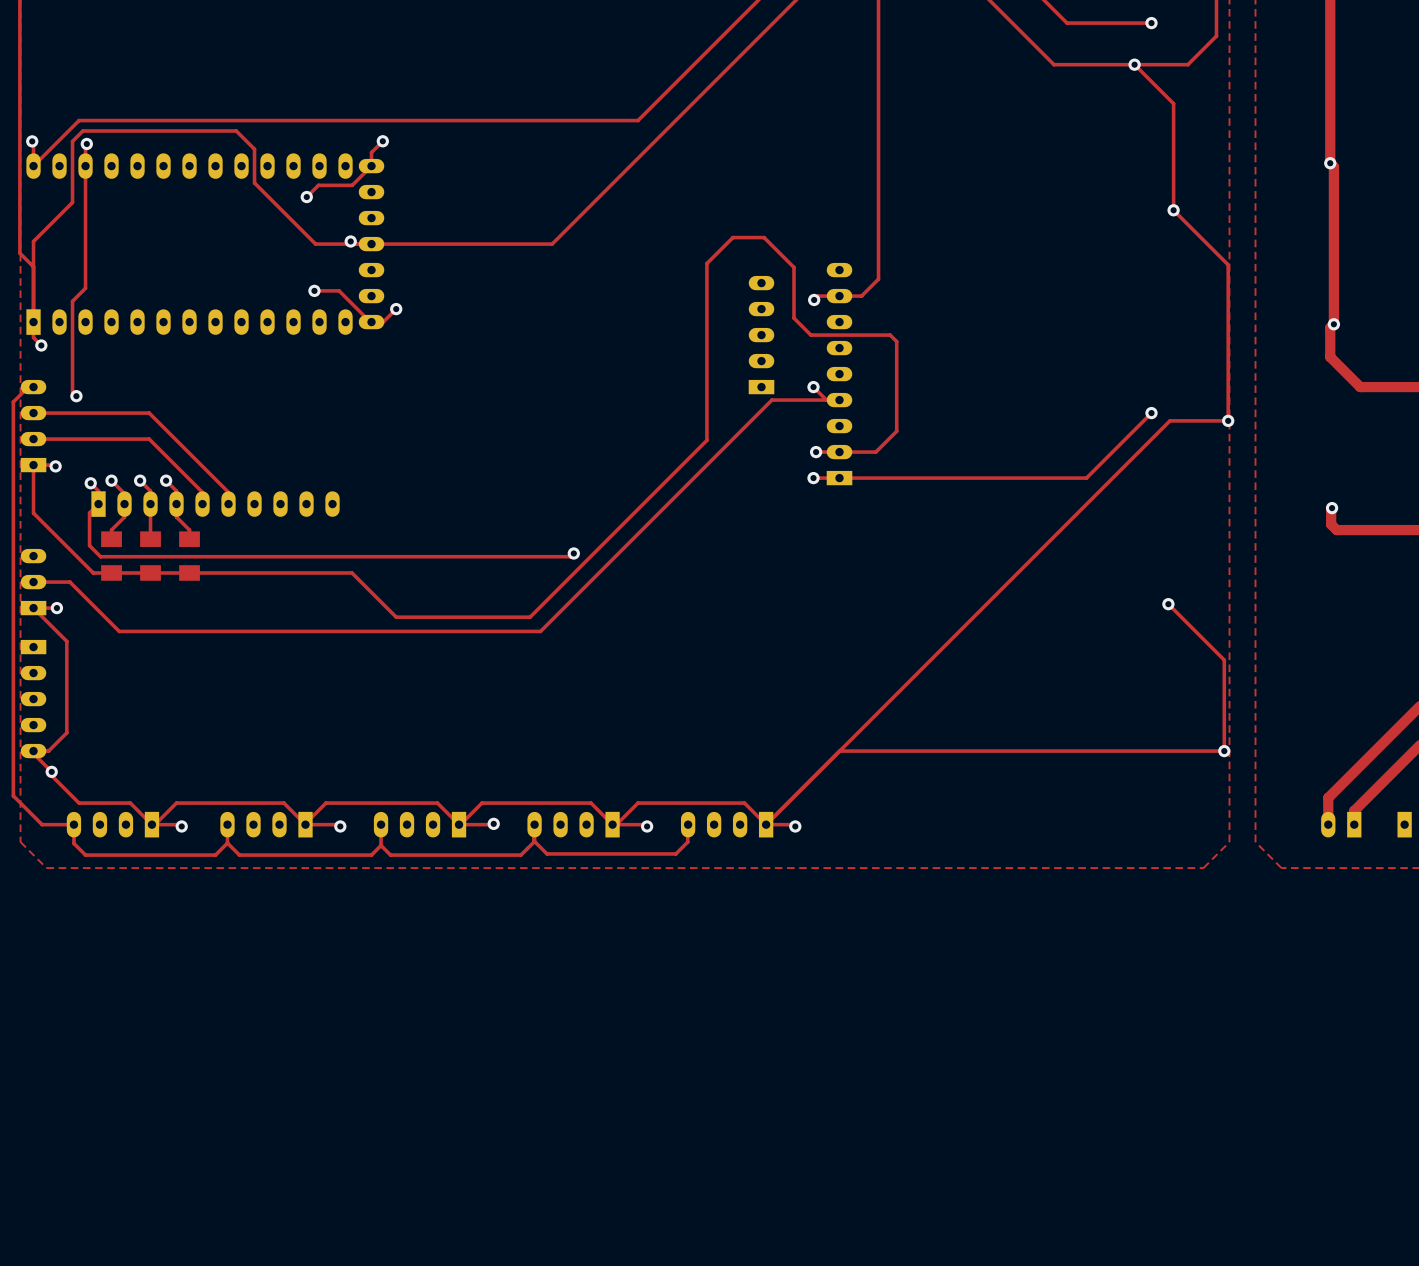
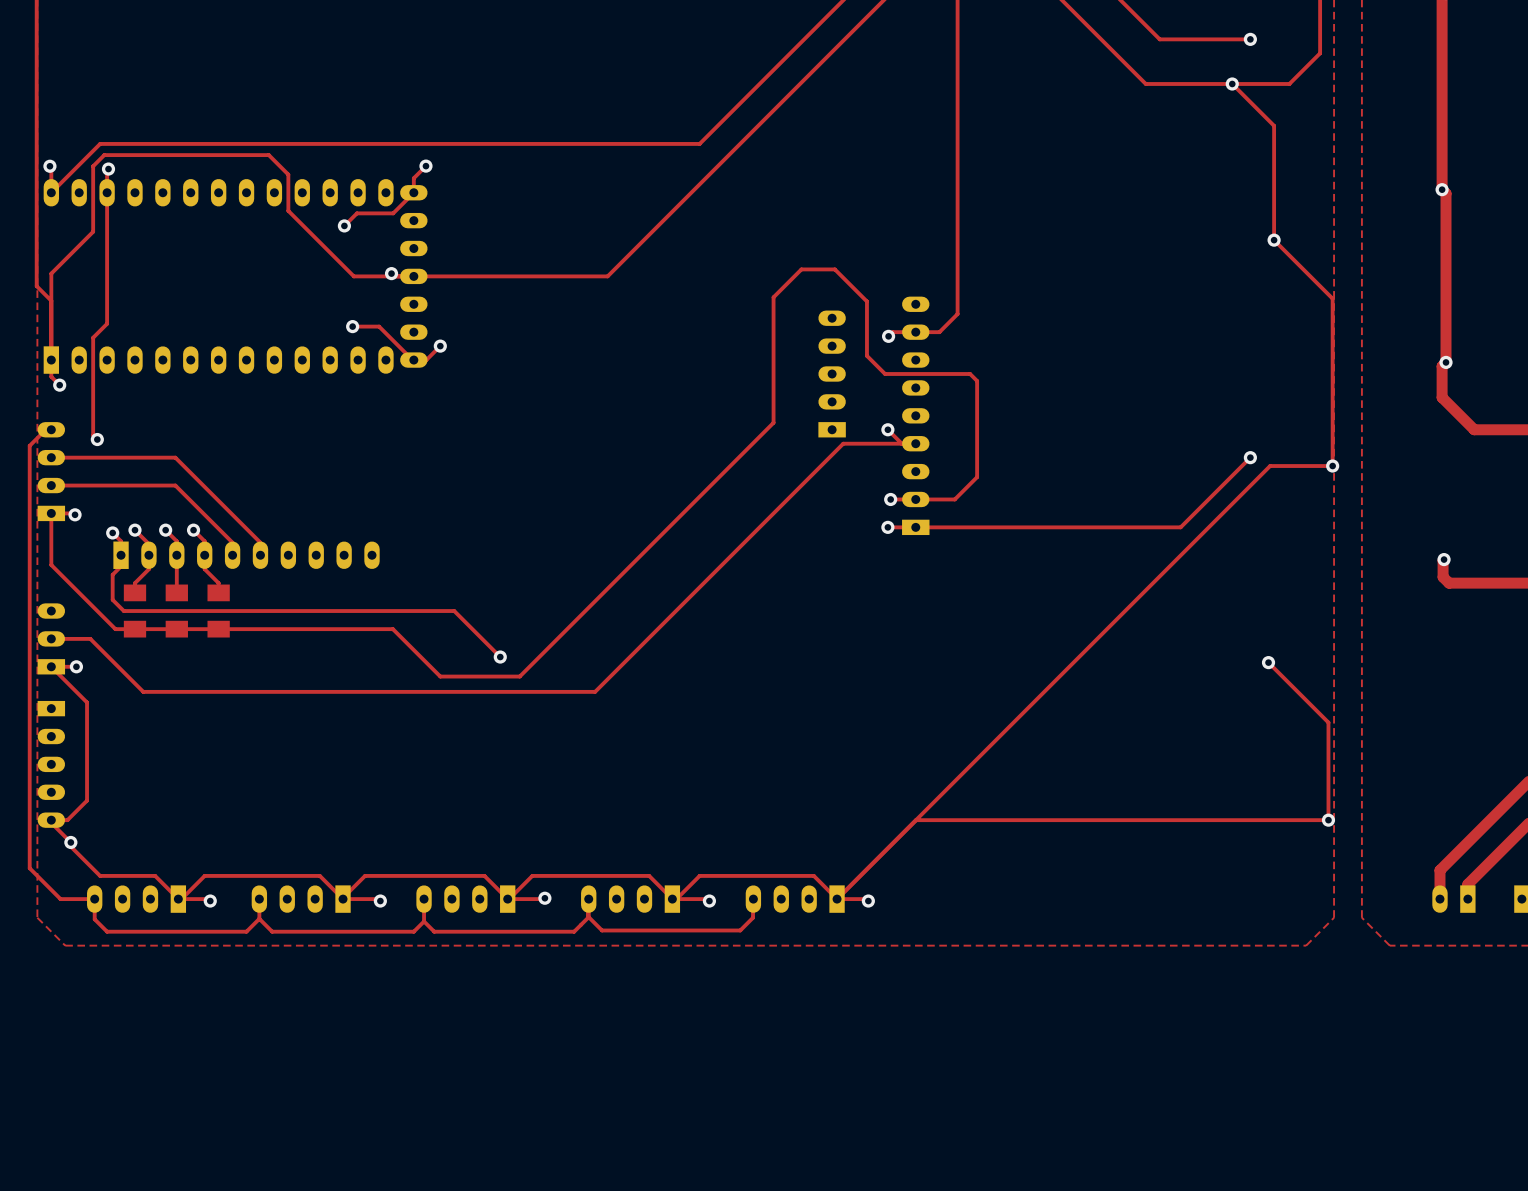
track: (706, 380) (706, 440) (530, 617) (470, 617) -> (773, 422) (519, 676)
track: (98, 504) (89, 513) (89, 545) (100, 556) (570, 556) (573, 553) -> (121, 555) (121, 566) (112, 574) (112, 599) (123, 611) (454, 611) (500, 657)
via: (573, 553) -> none
via: none -> (500, 657)

